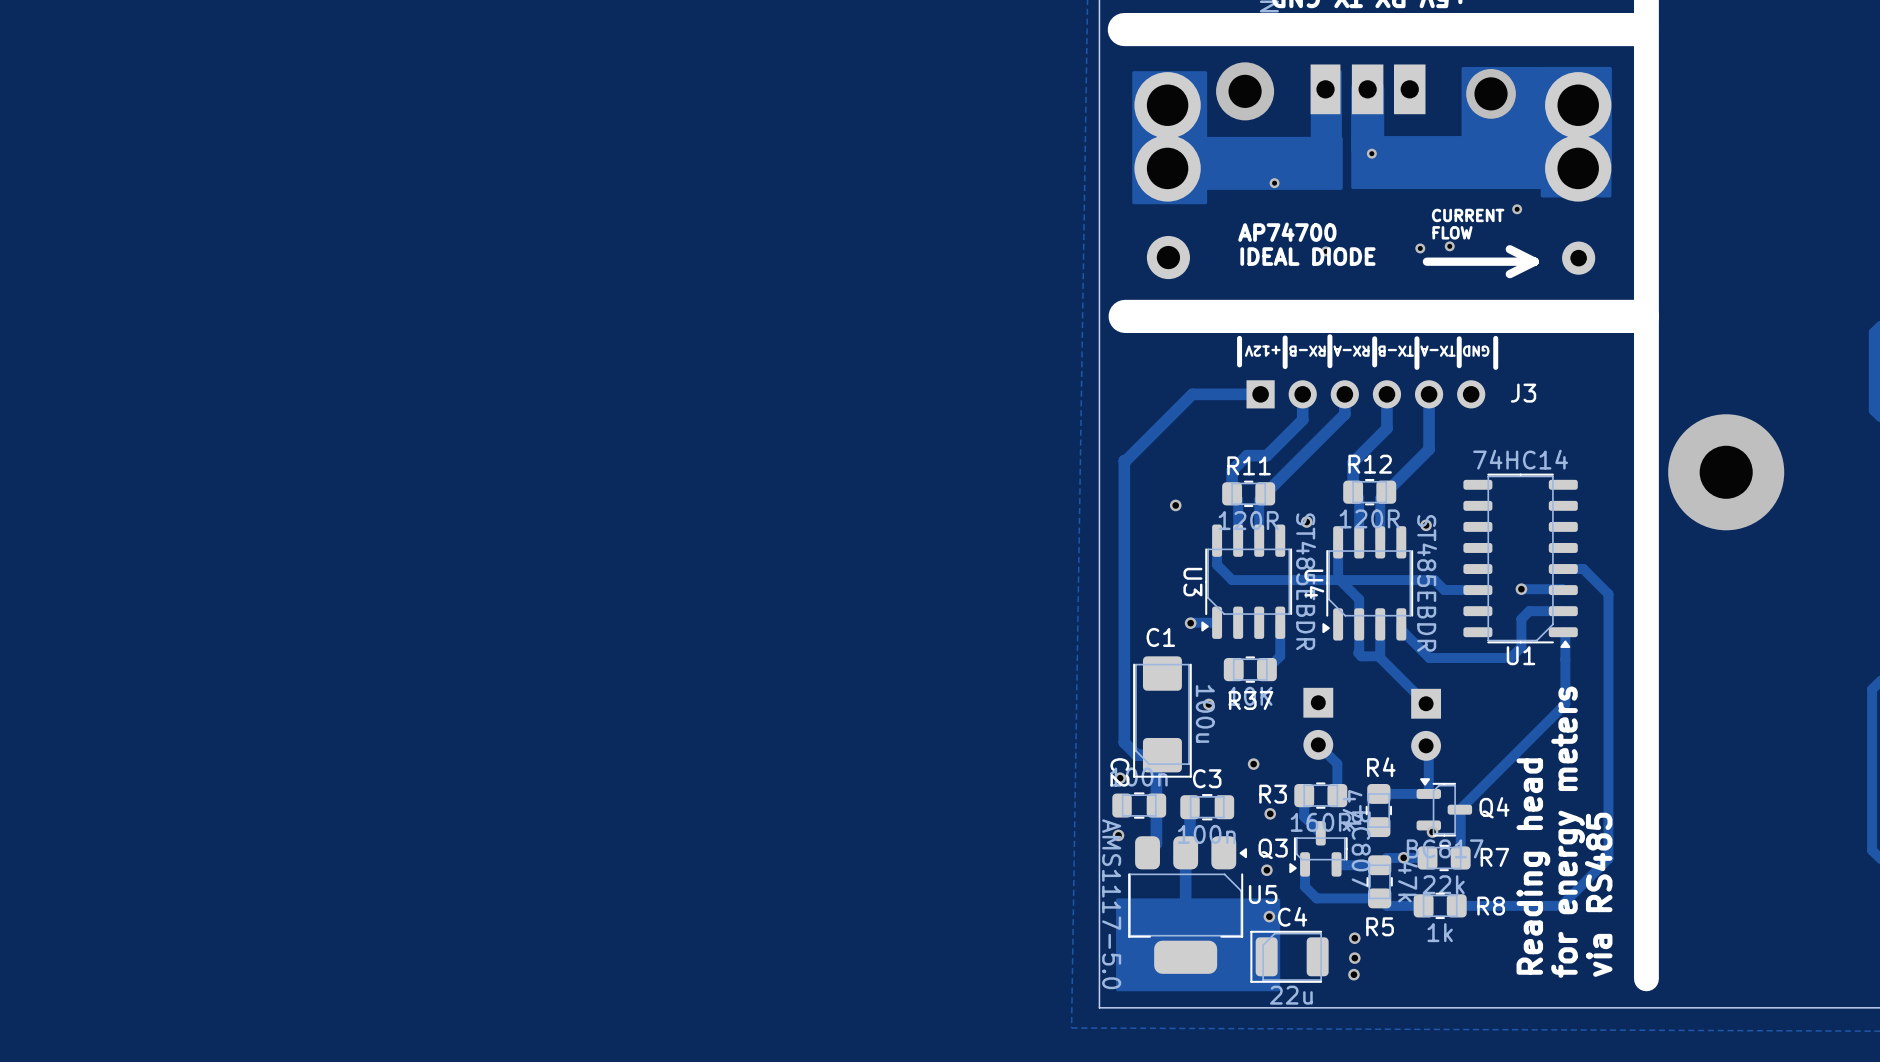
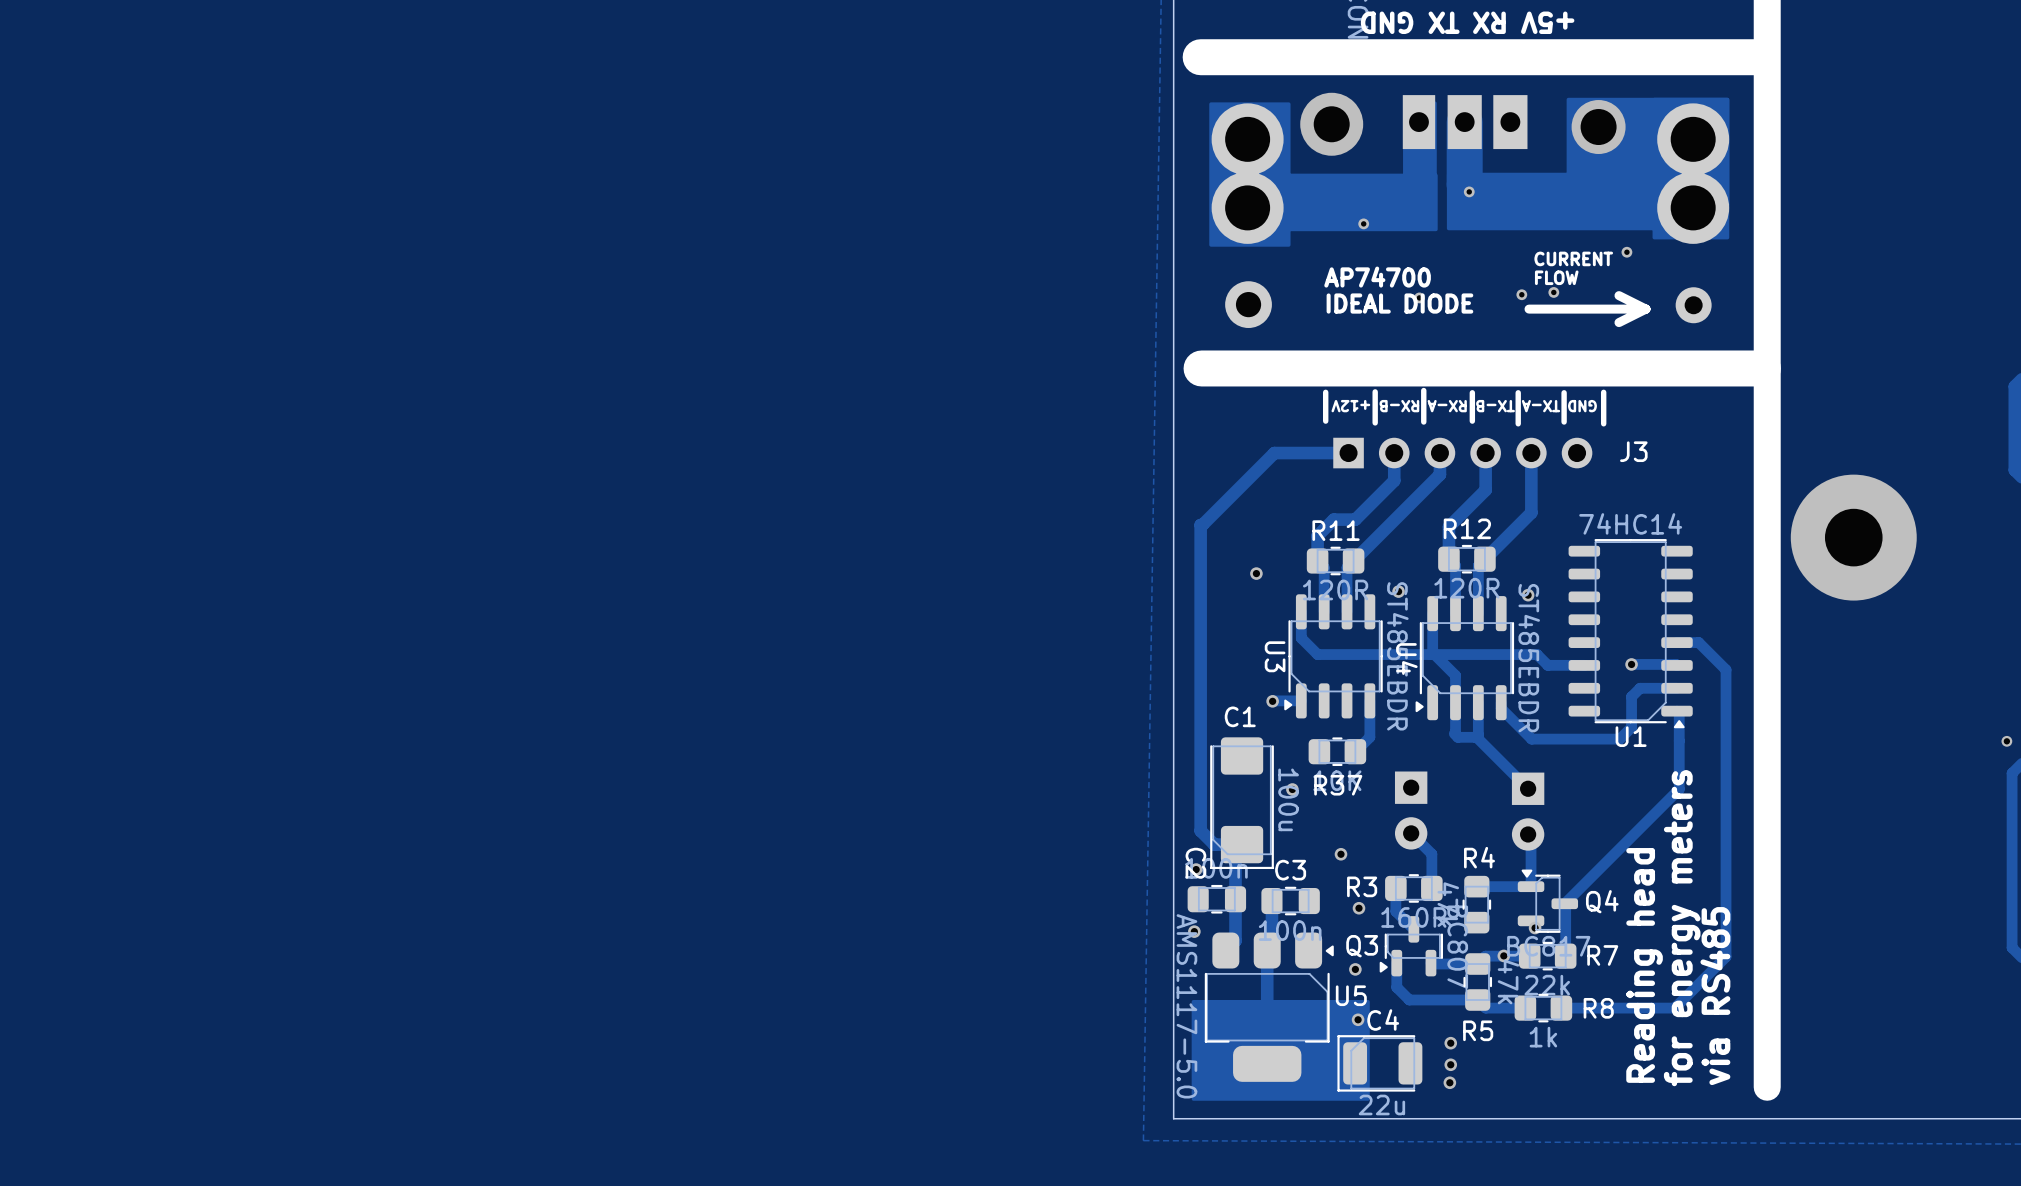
via: none -> (2006, 741)

